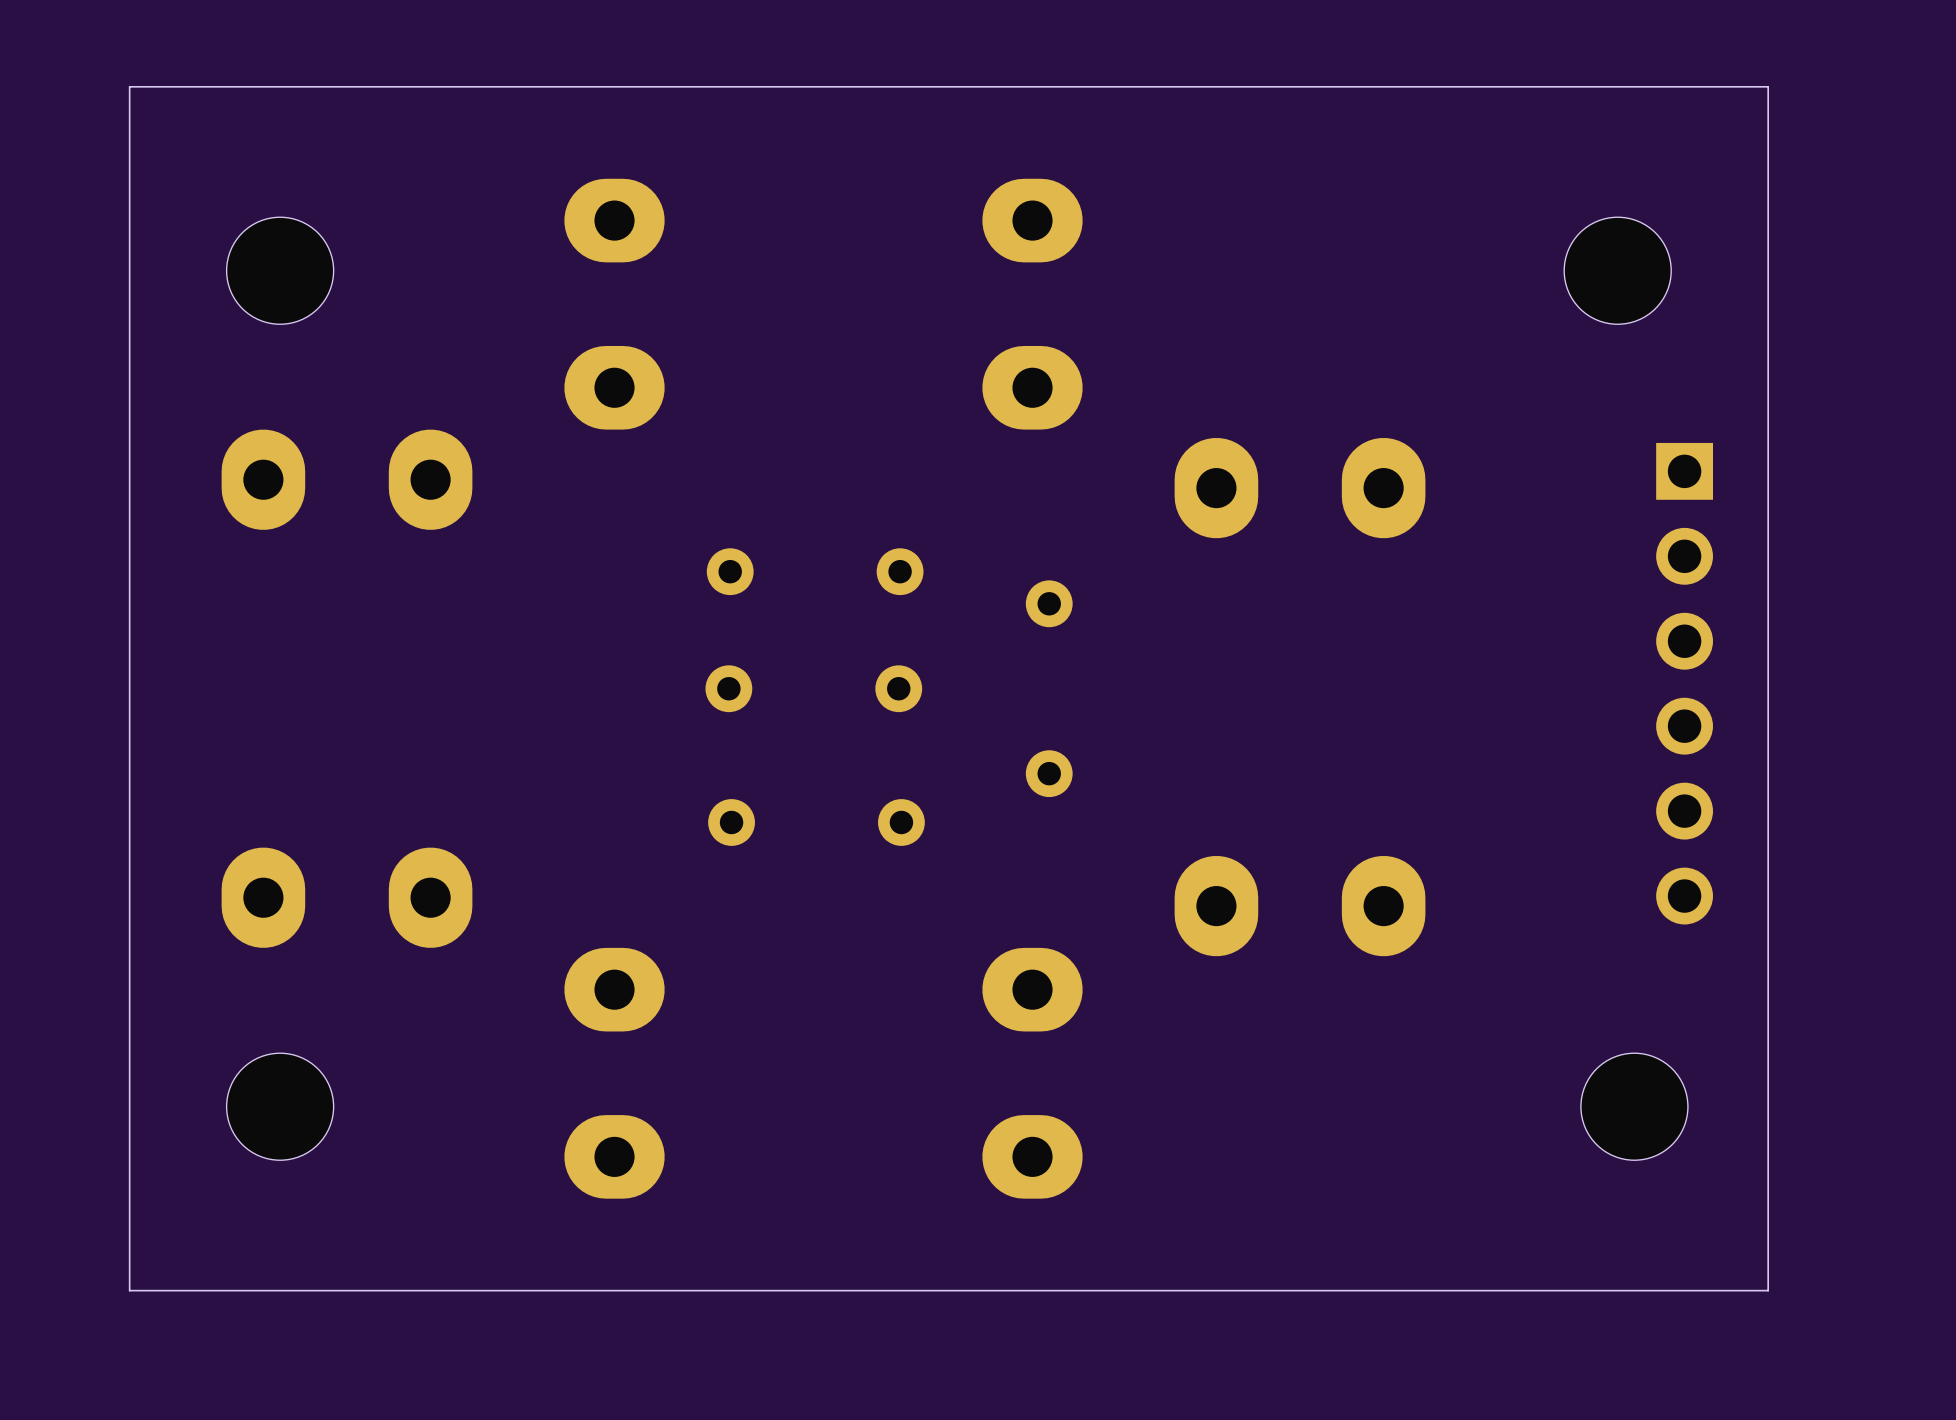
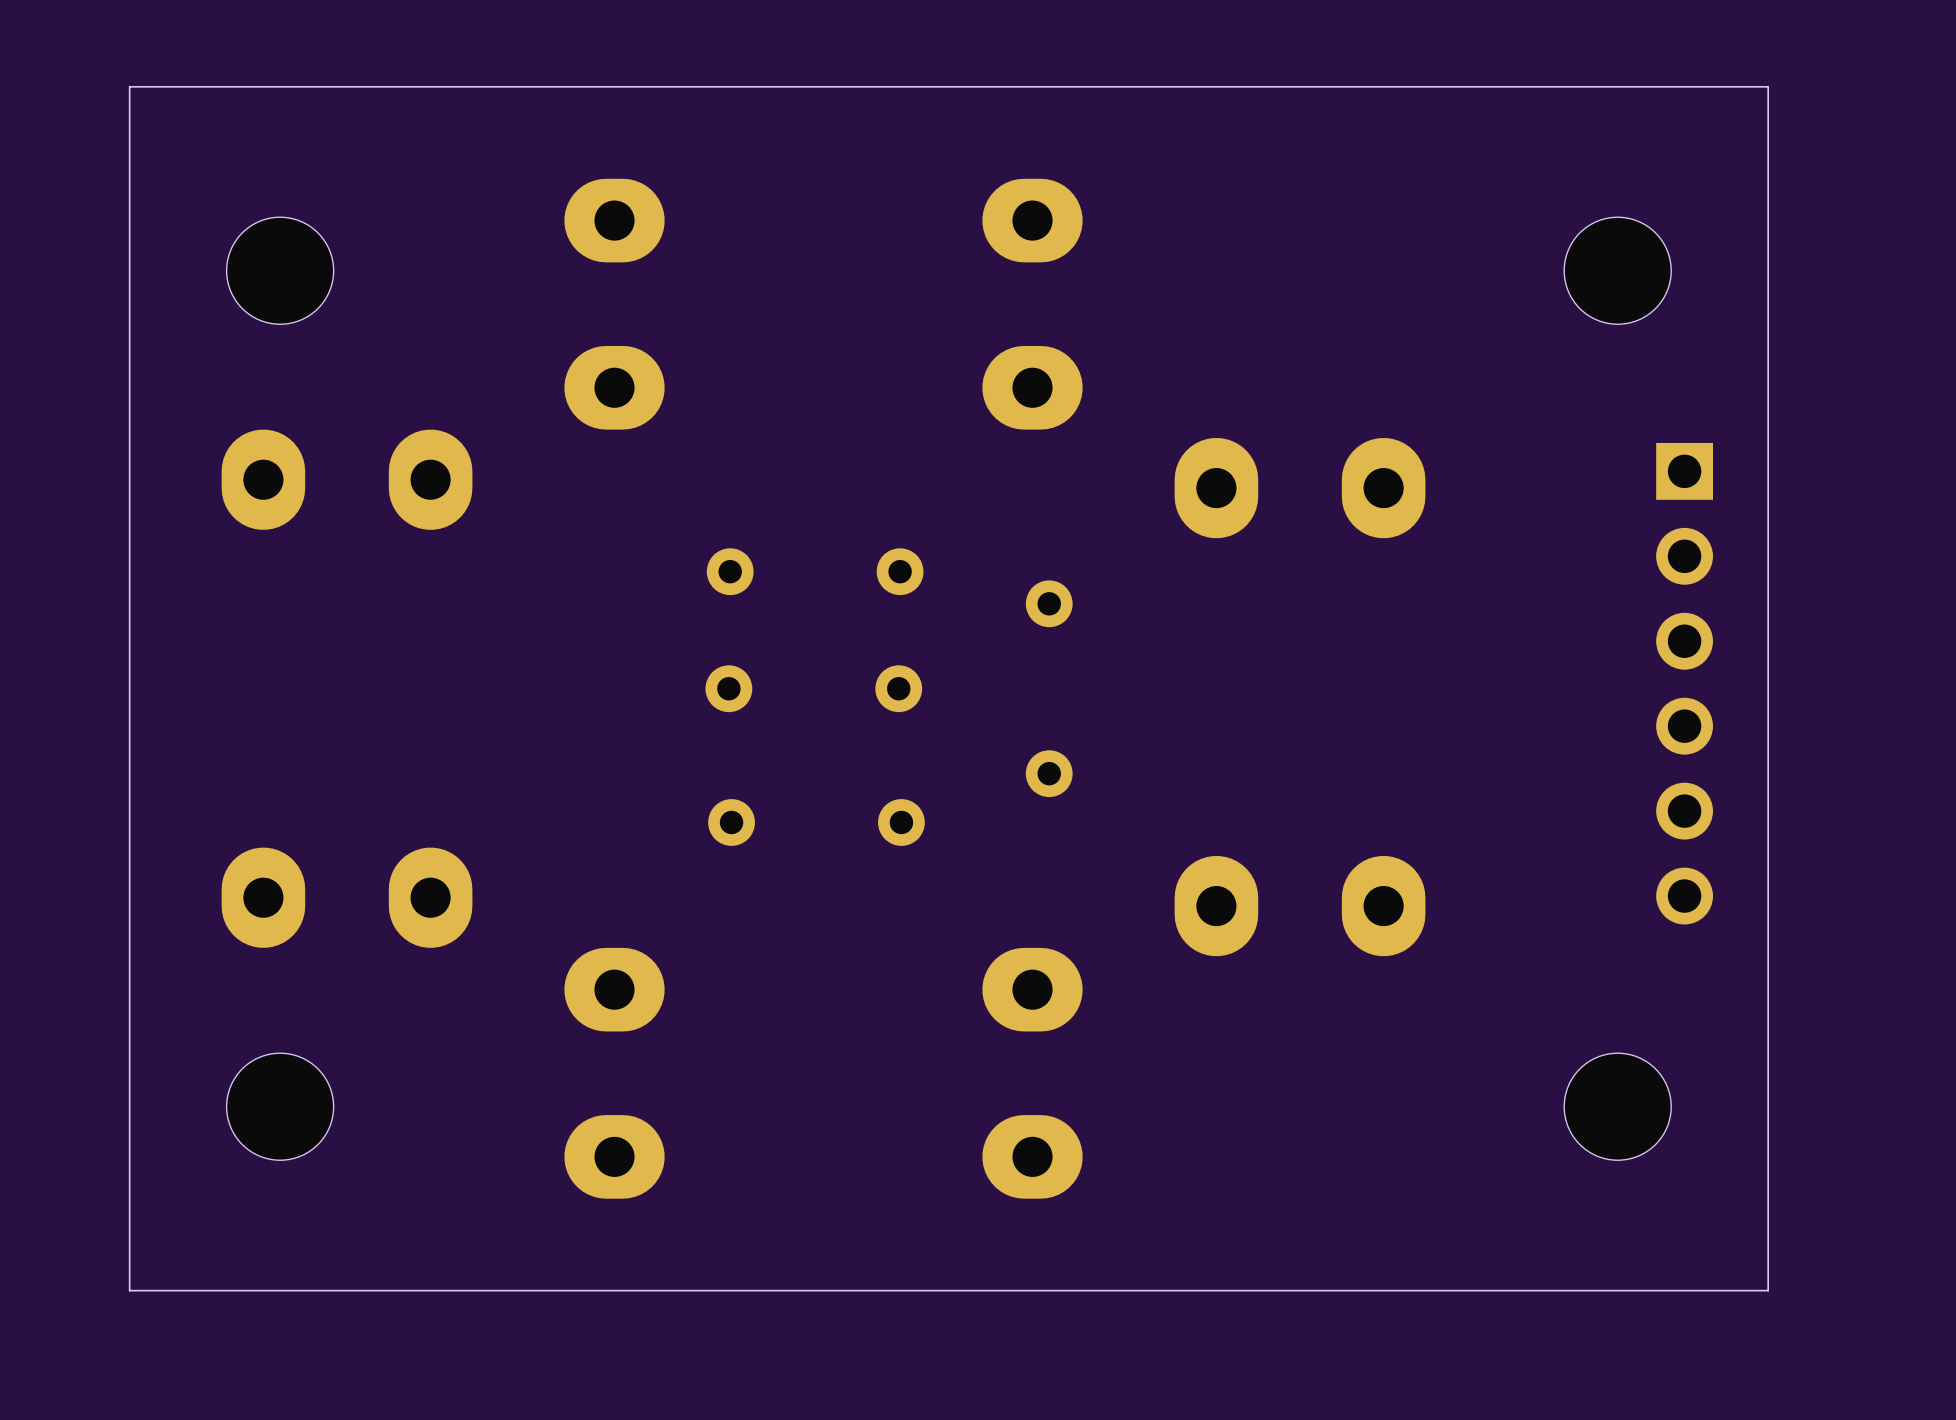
part position: (1634, 1106) -> (1617, 1106)

